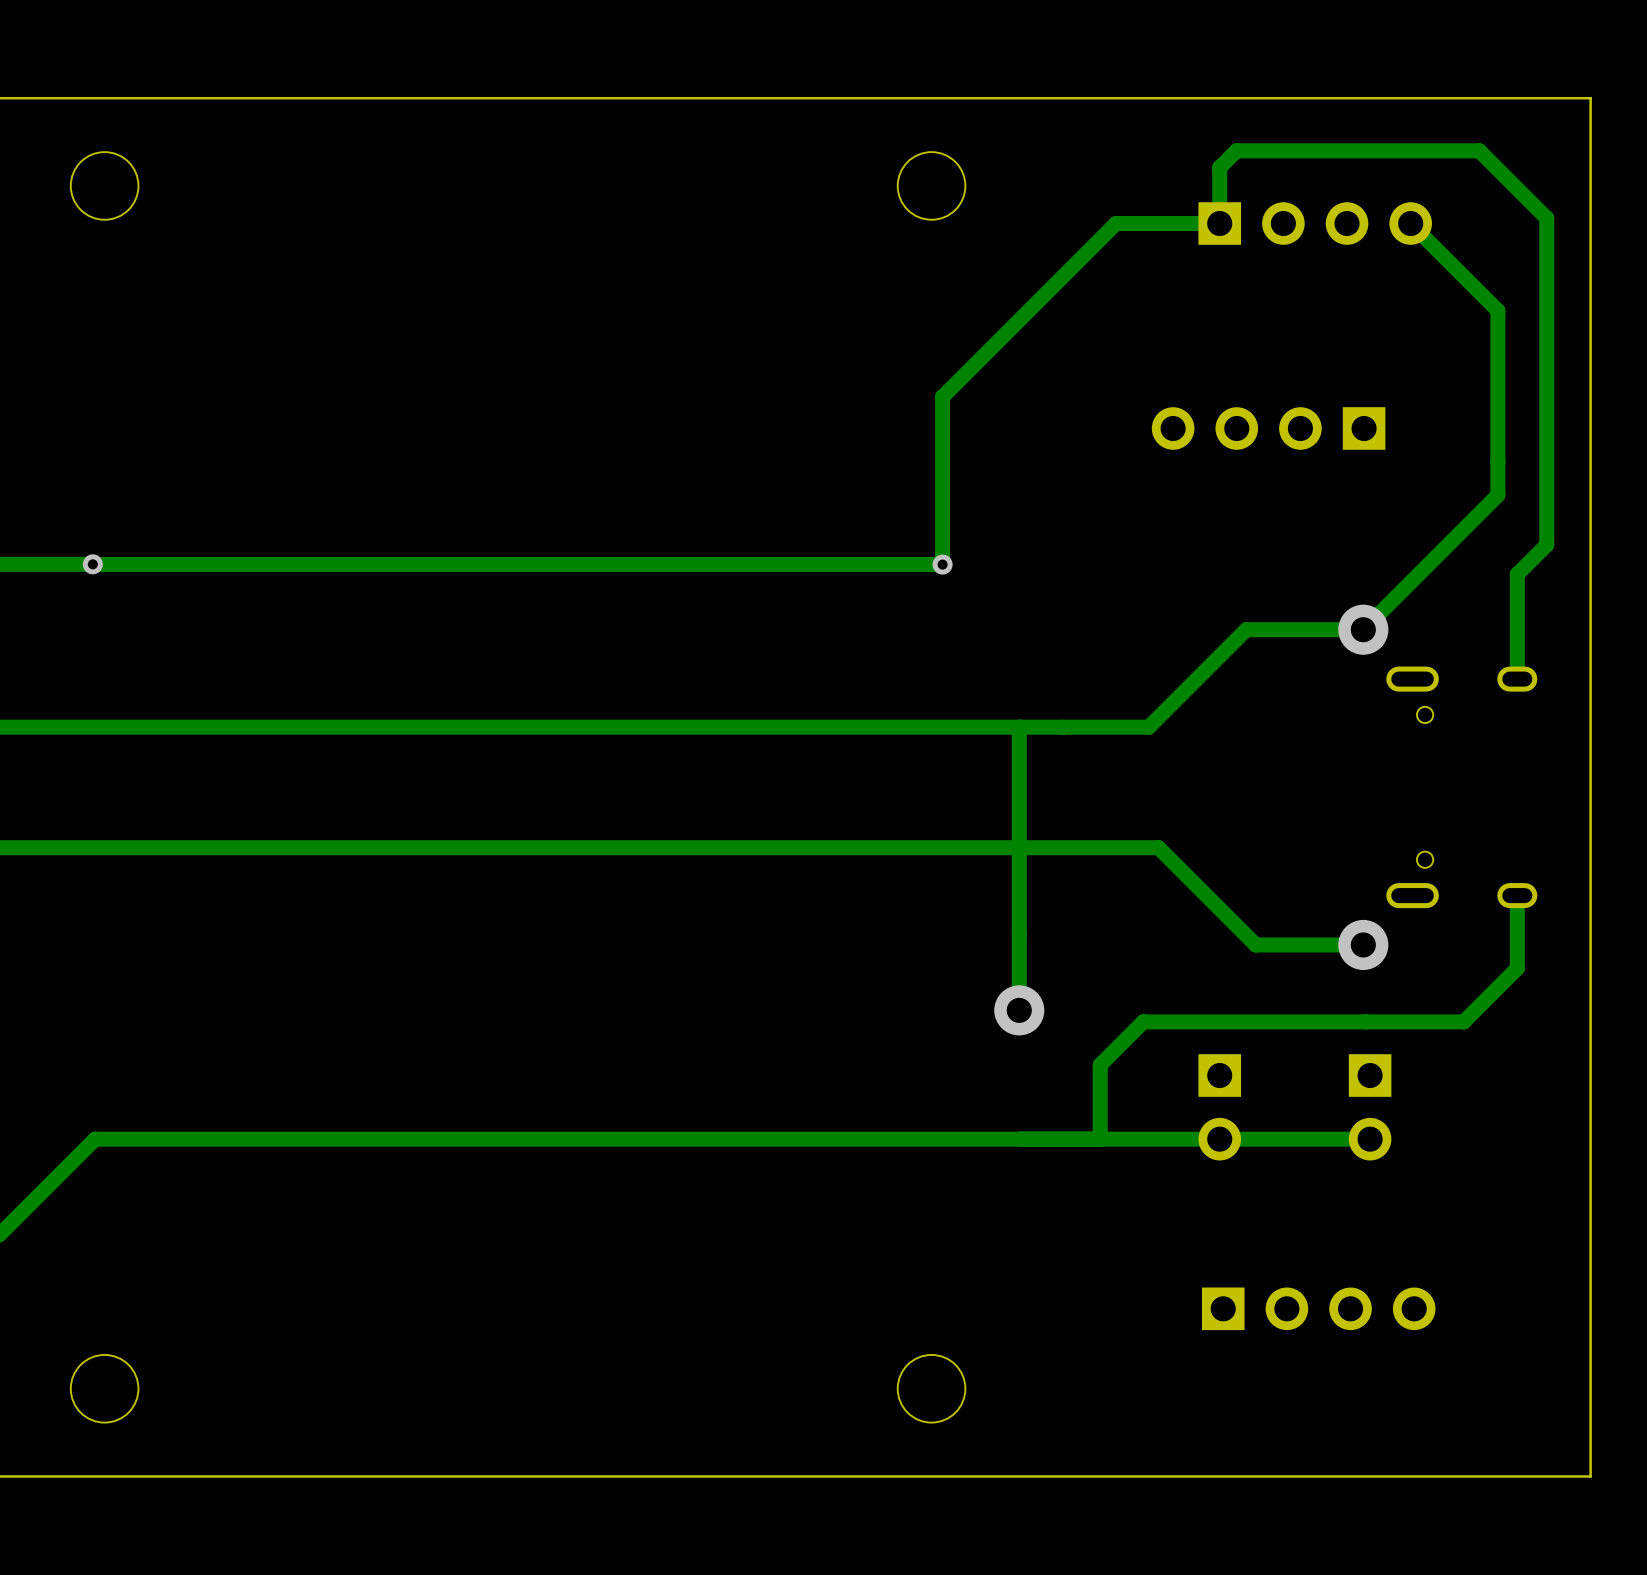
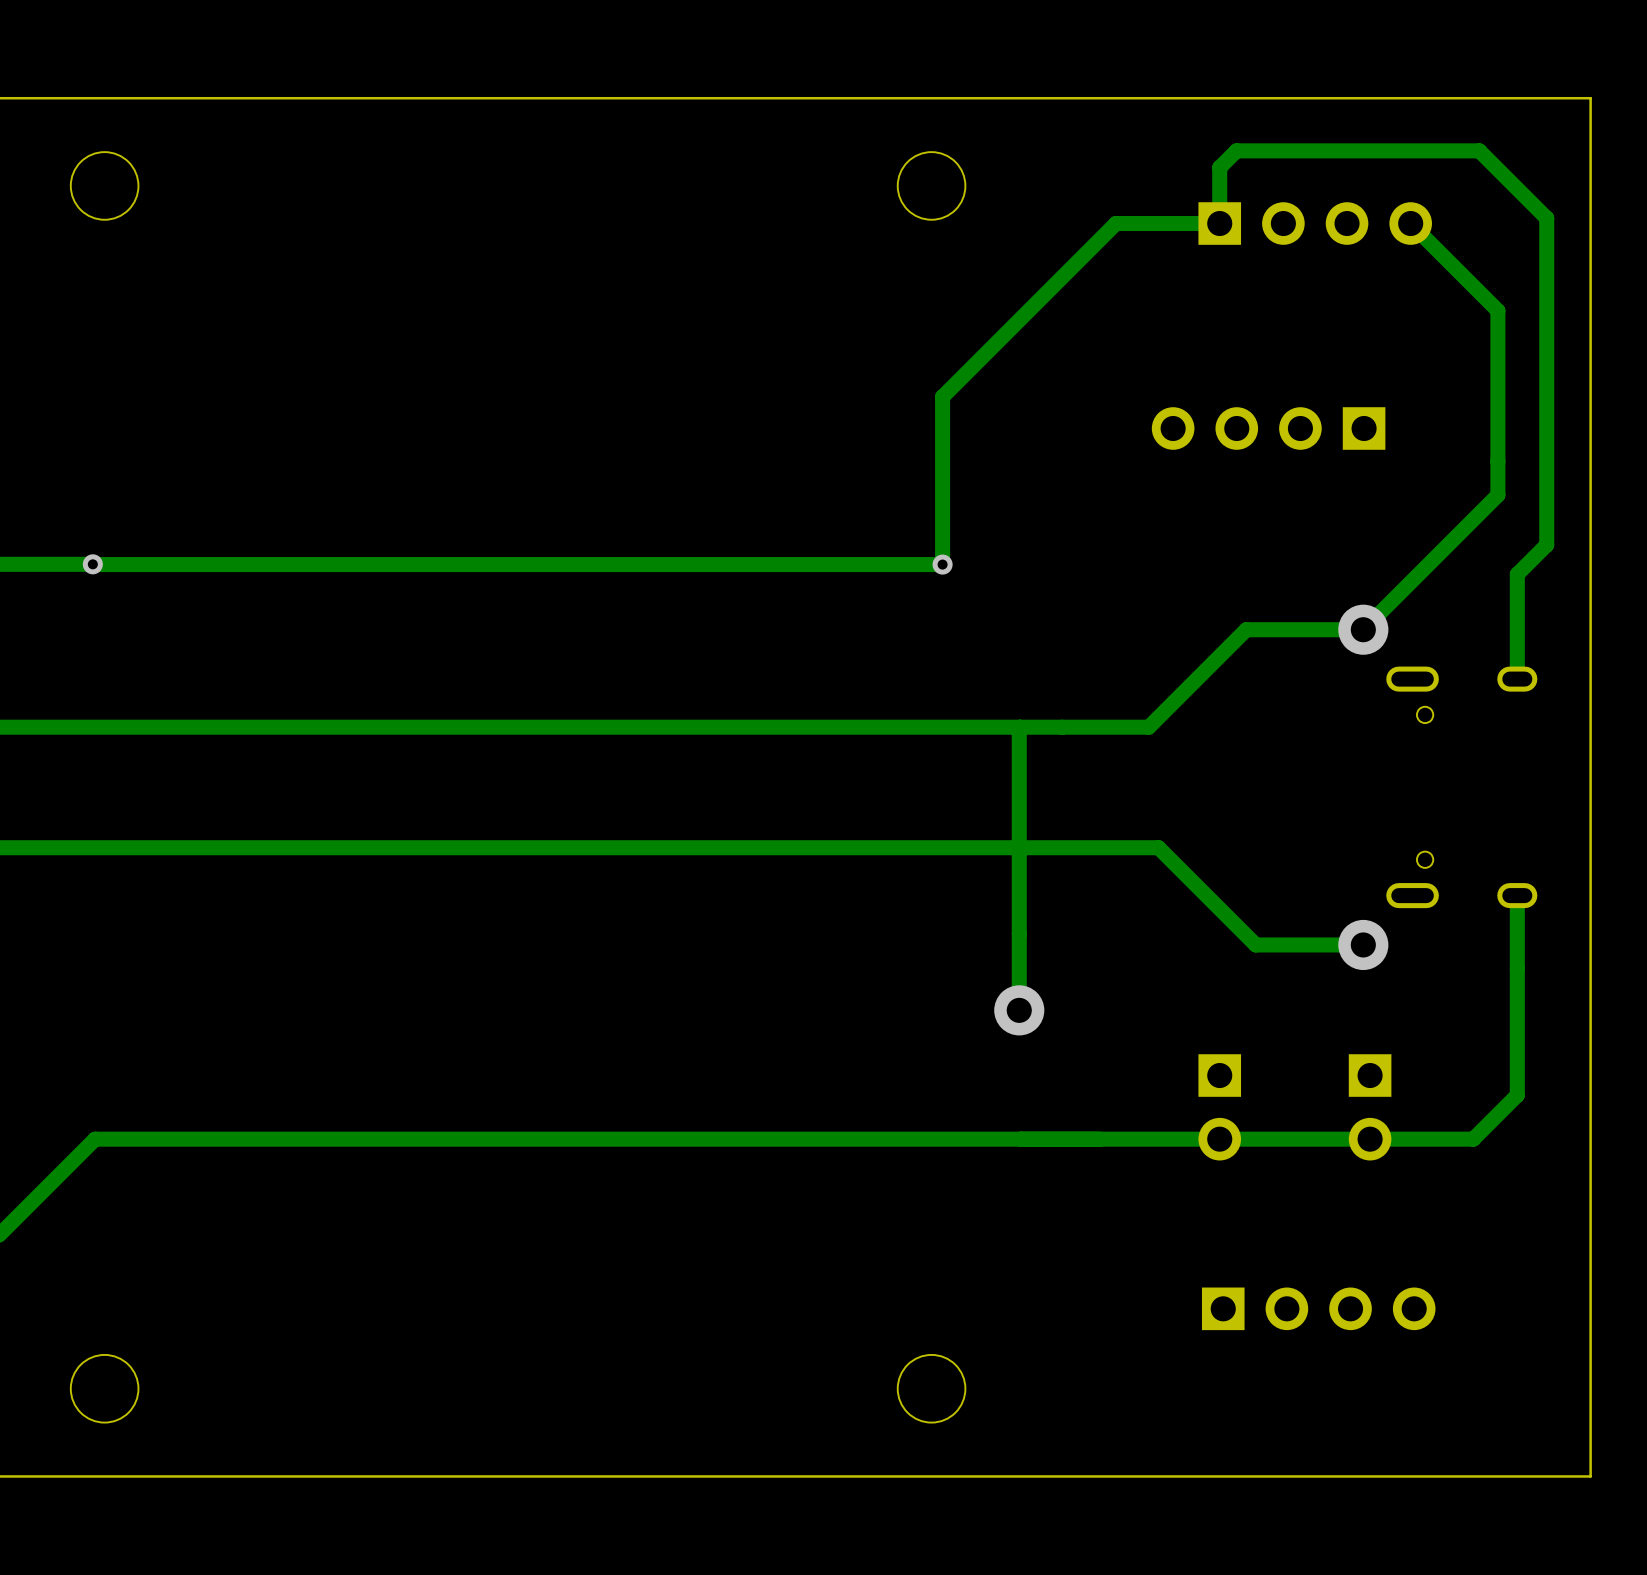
track: (1517, 968) (1463, 1021) (1143, 1021) (1100, 1064) (1100, 1139) -> (1517, 968) (1517, 1095) (1473, 1139) (1370, 1139)

